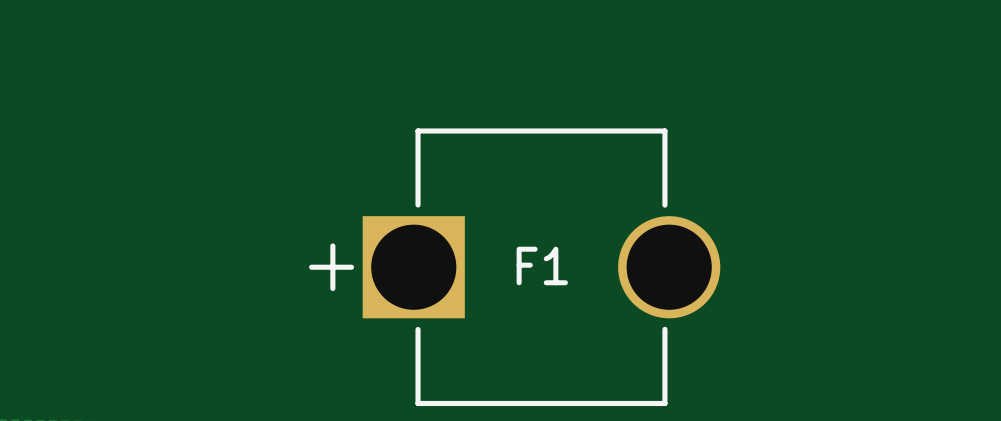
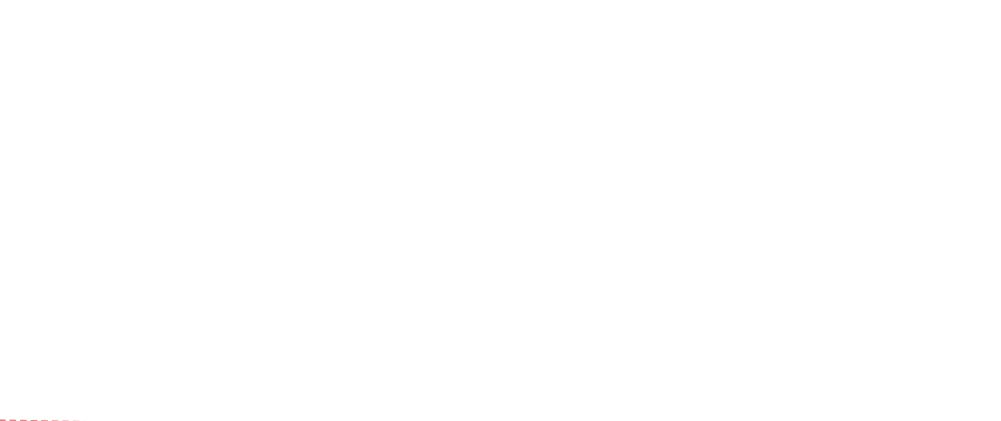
F1: (514, 267) -> none

